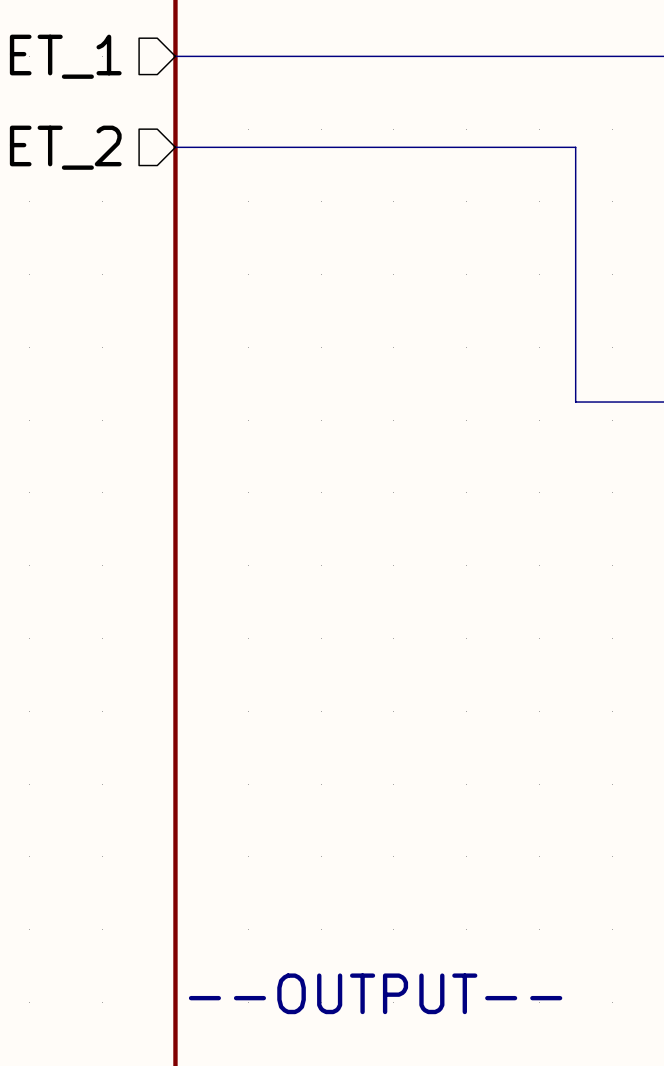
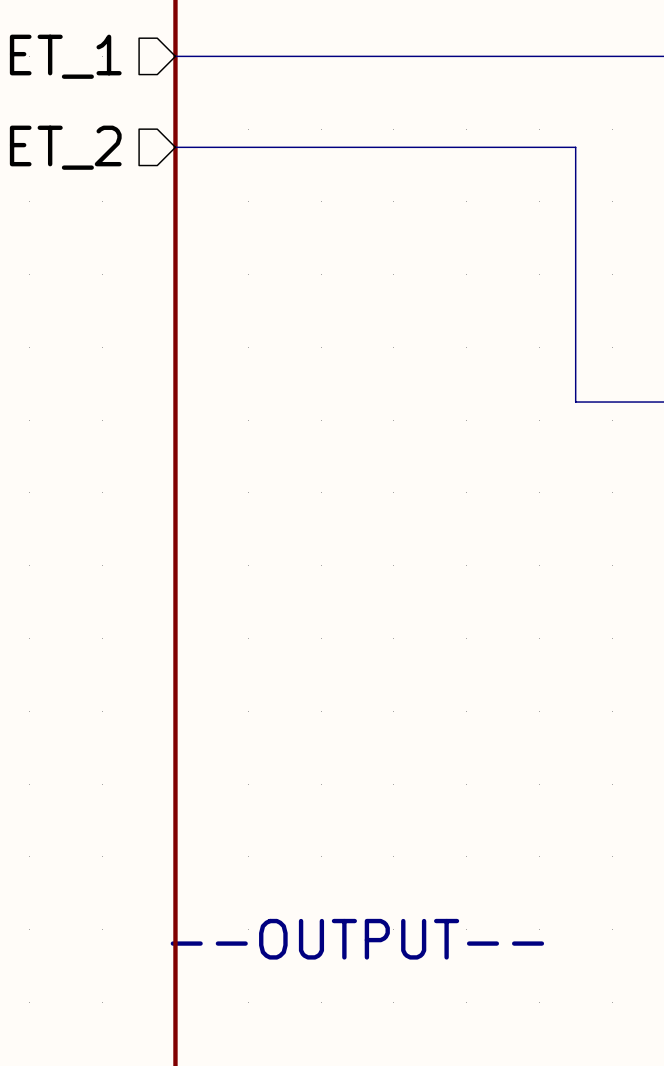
text position: --OUTPUT-- (375, 993) -> --OUTPUT-- (357, 939)

